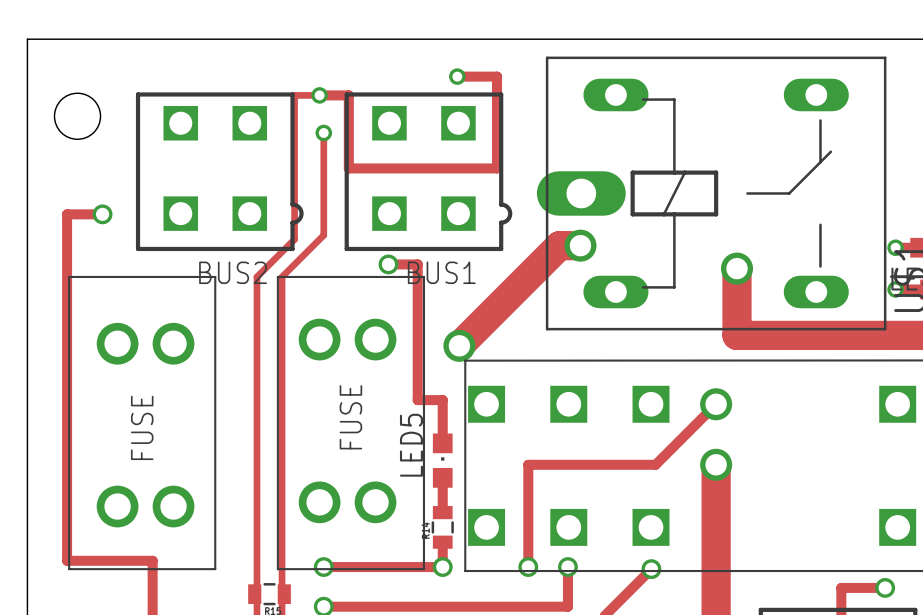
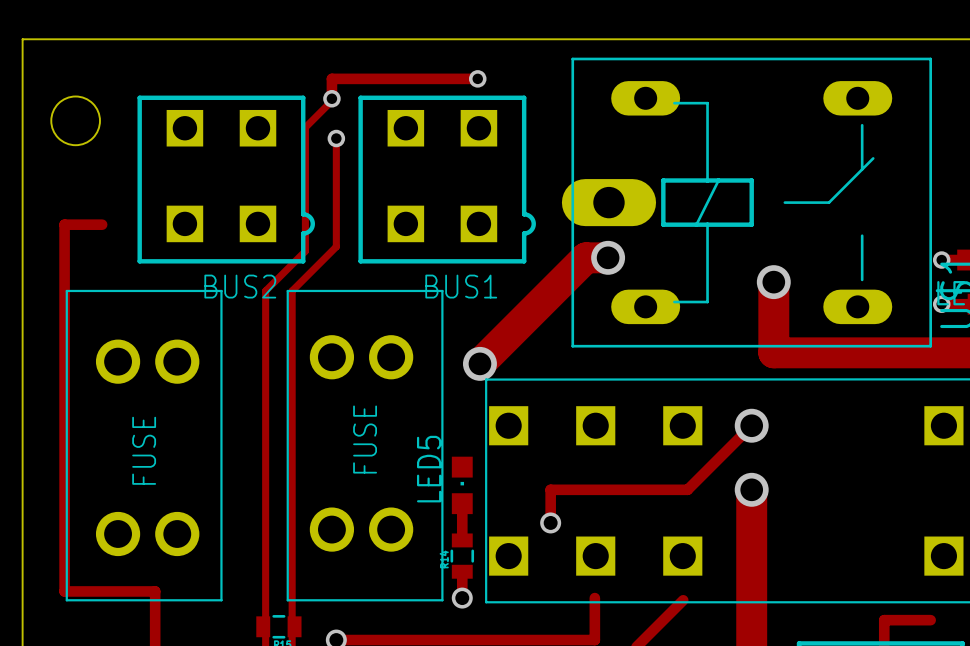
track: (457, 76) (497, 76) (497, 168) (348, 168) (348, 95) (294, 95) (294, 122) -> (477, 78) (331, 78) (331, 100) (305, 127)
via: (102, 214) -> none
track: (388, 264) (417, 264) (417, 400) (442, 400) (442, 443) -> none
via: (388, 264) -> none
track: (528, 464) (528, 567) -> (552, 489) (550, 489) (550, 522)
via: none -> (550, 522)
track: (323, 567) (442, 567) -> none
via: (323, 567) -> none
via: (528, 567) -> none
via: (567, 567) -> none
via: (651, 569) -> none
via: (885, 587) -> none

